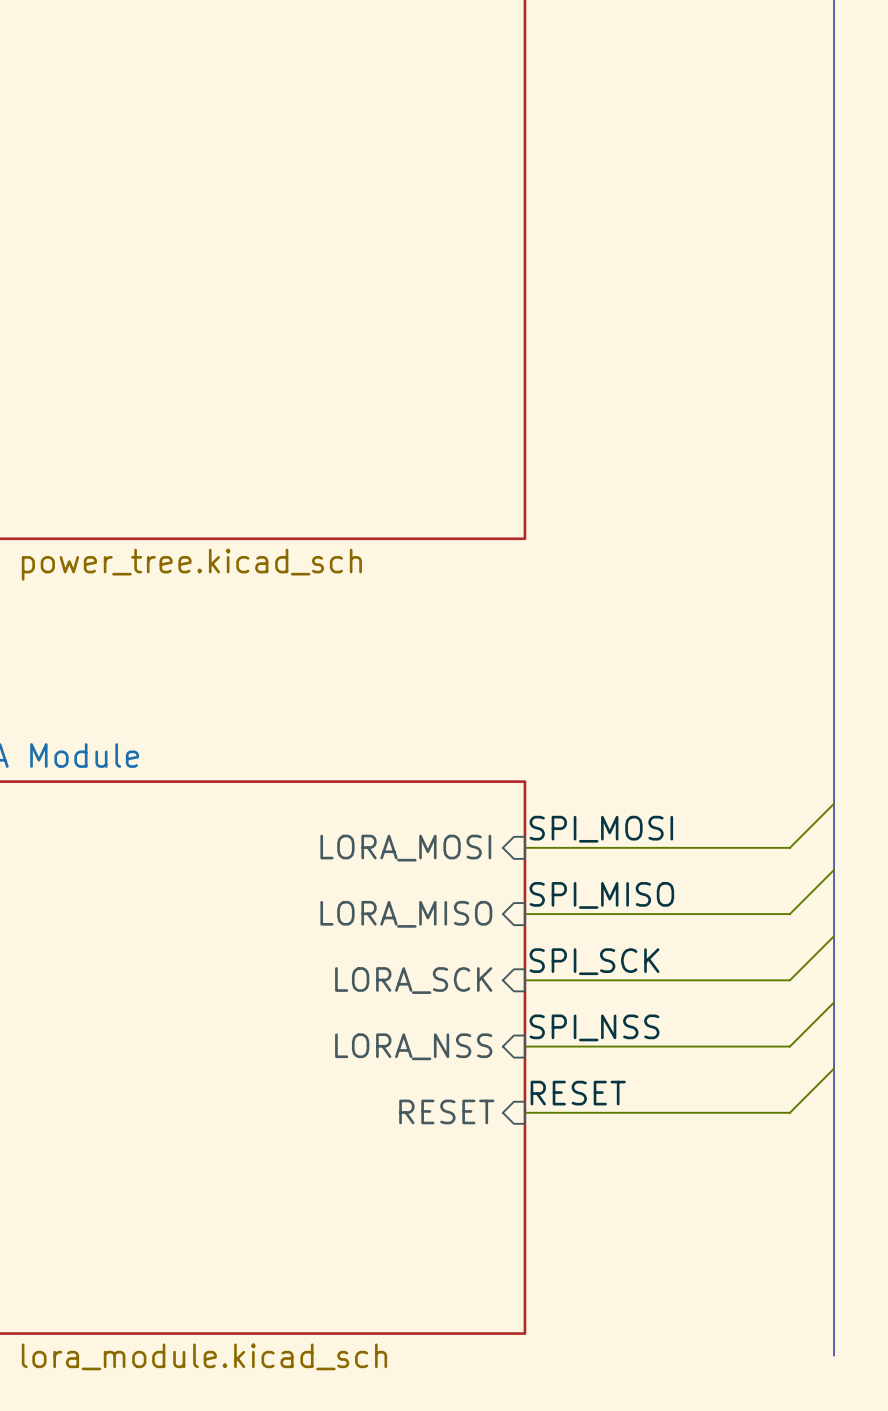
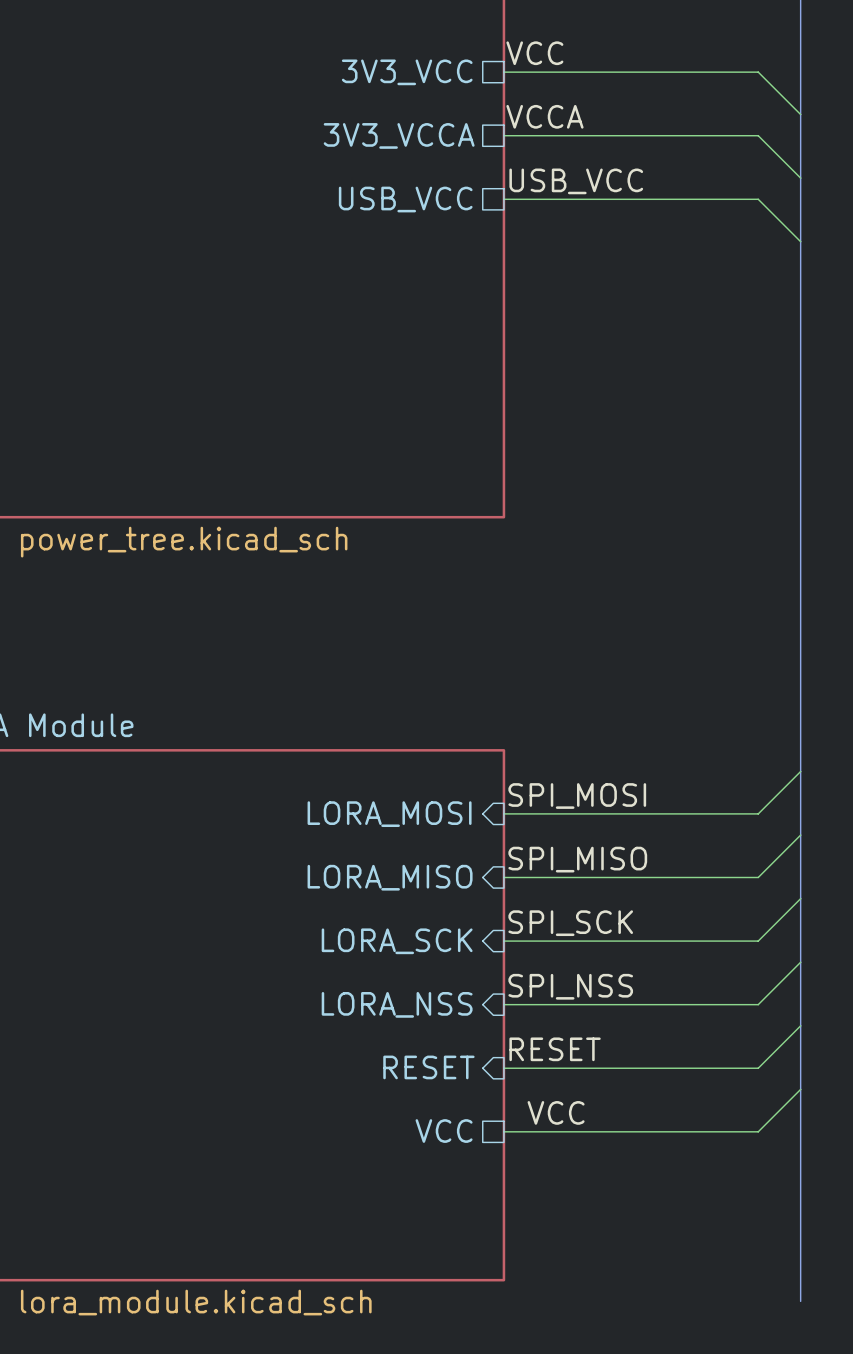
label: none -> VCC (534, 53)
sheet pin: none -> 3V3_VCC (407, 72)
wire: none -> (503, 72) (758, 72) (800, 114)
label: none -> VCCA (544, 116)
sheet pin: none -> 3V3_VCCA (399, 135)
wire: none -> (503, 135) (758, 135) (800, 178)
label: none -> USB_VCC (576, 181)
sheet pin: none -> USB_VCC (405, 199)
wire: none -> (503, 199) (758, 199) (800, 241)
wire: none -> (800, 1089) (758, 1131) (503, 1131)
label: none -> VCC (556, 1112)
sheet pin: none -> VCC (444, 1131)

